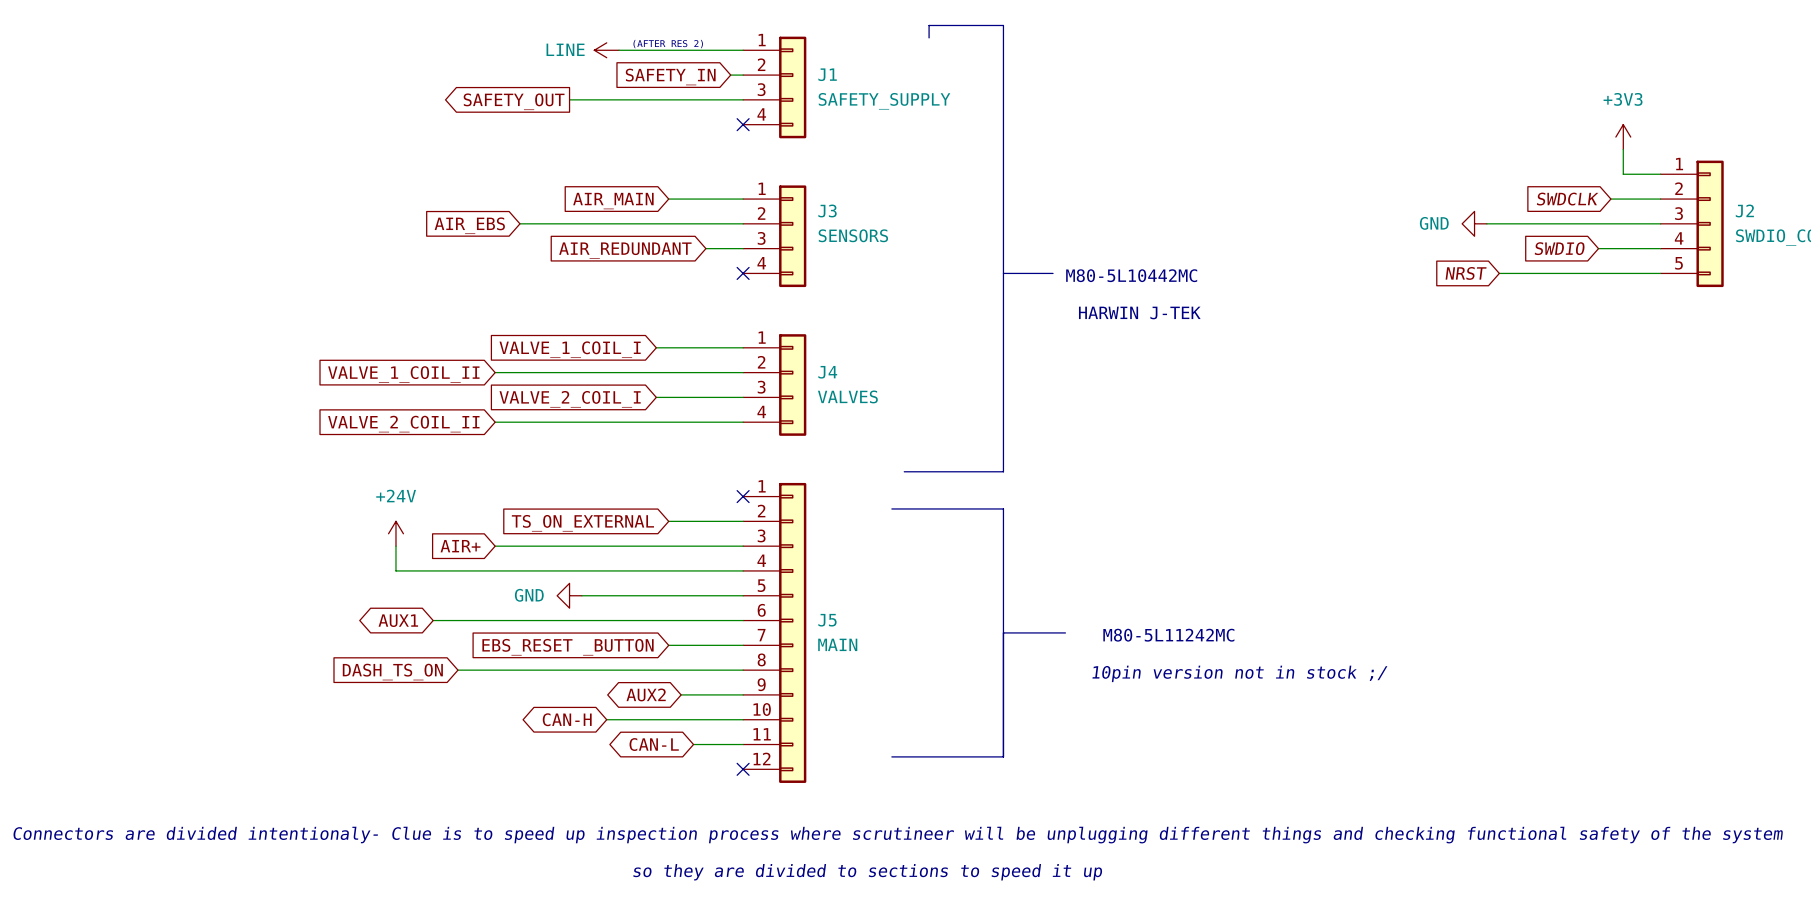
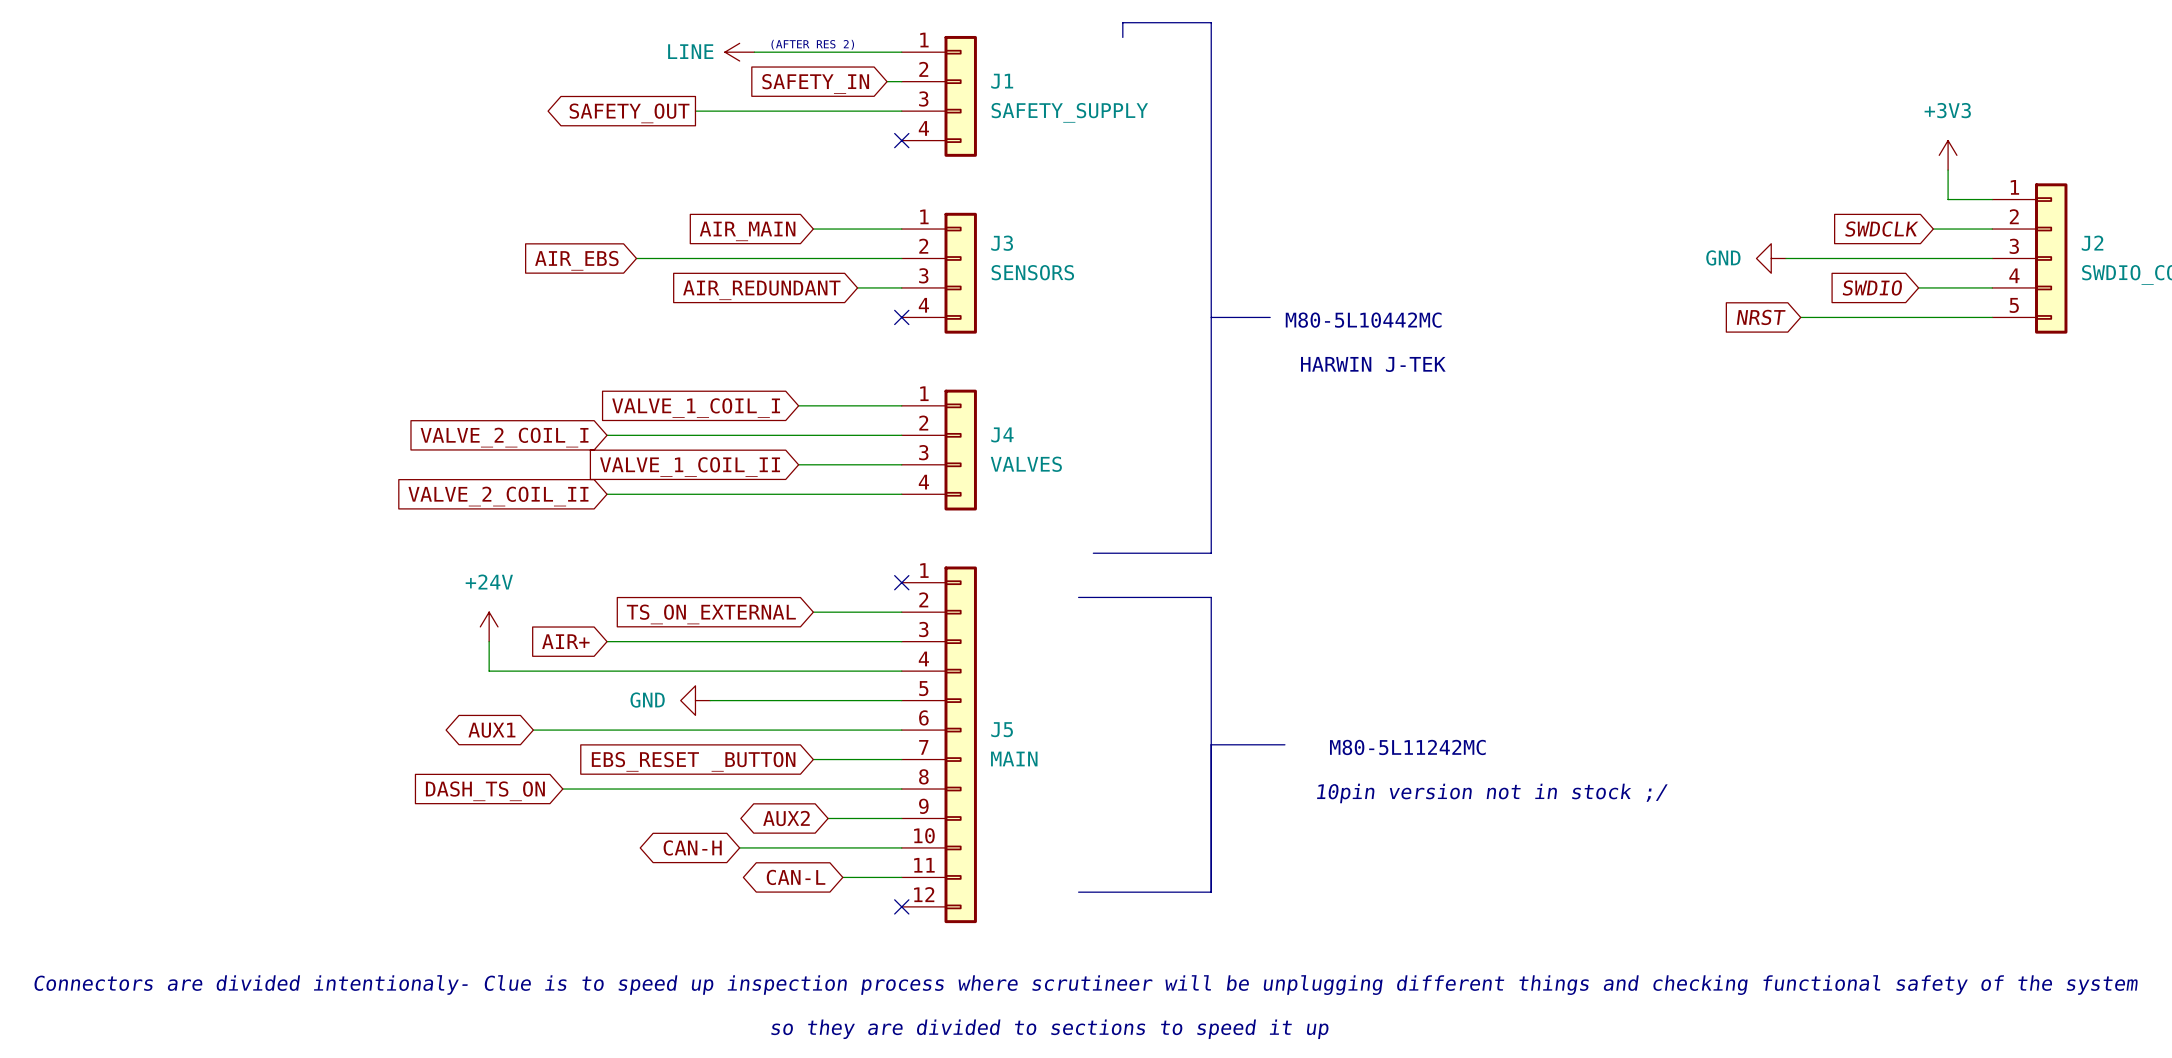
global label: VALVE_1_COIL_II (403, 374) -> VALVE_2_COIL_I (504, 437)
global label: VALVE_2_COIL_I (570, 399) -> VALVE_1_COIL_II (690, 467)

